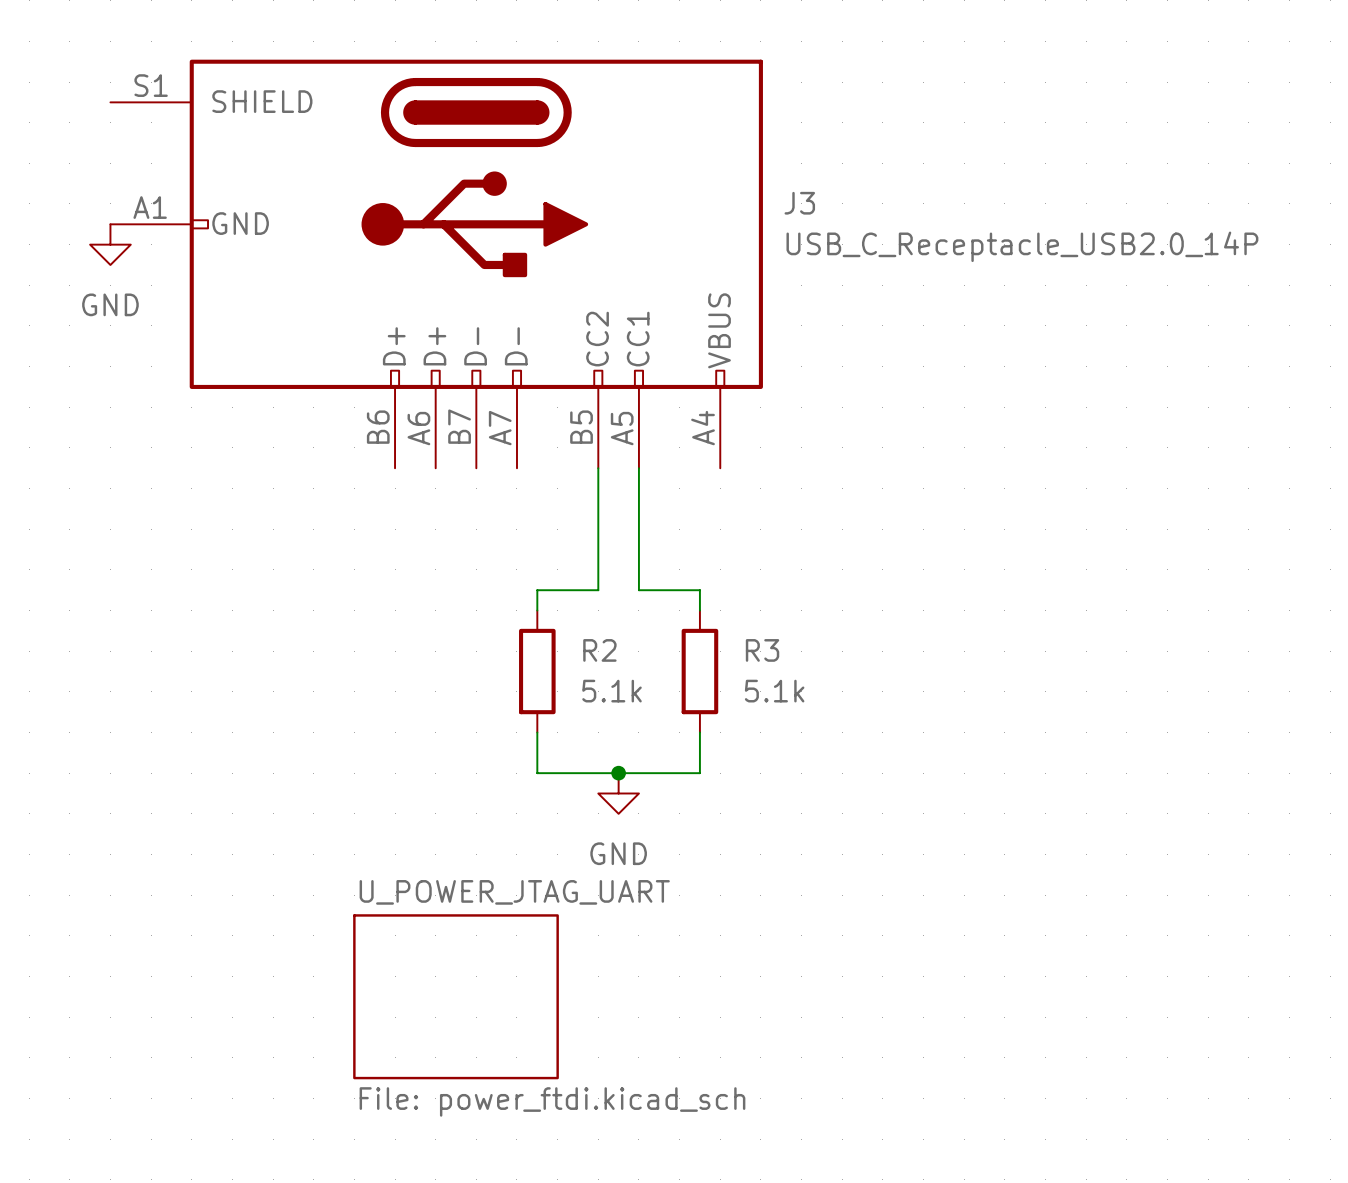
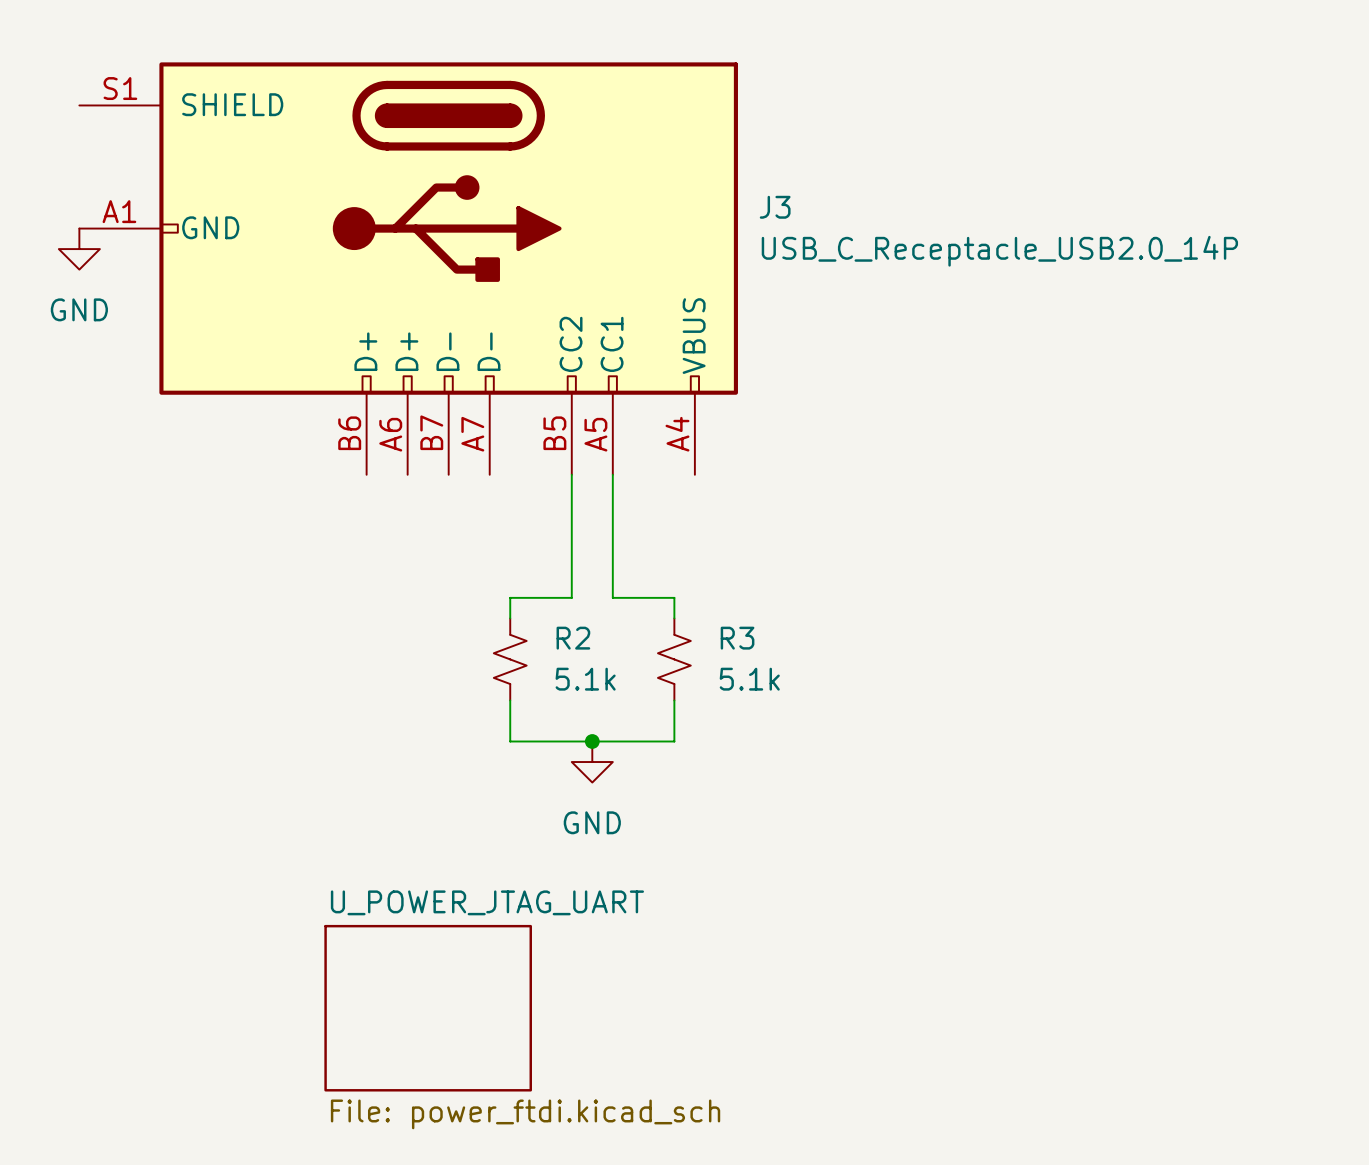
R2 symbol: [519, 610, 556, 733] -> [493, 618, 527, 701]
R3 symbol: [681, 610, 719, 733] -> [657, 618, 691, 701]
wire: (537, 732) (537, 773) (699, 773) (699, 732) -> (510, 700) (510, 741) (674, 741) (674, 700)
junction position: (618, 773) -> (592, 741)
power symbol position: GND (618, 793) -> GND (592, 762)

